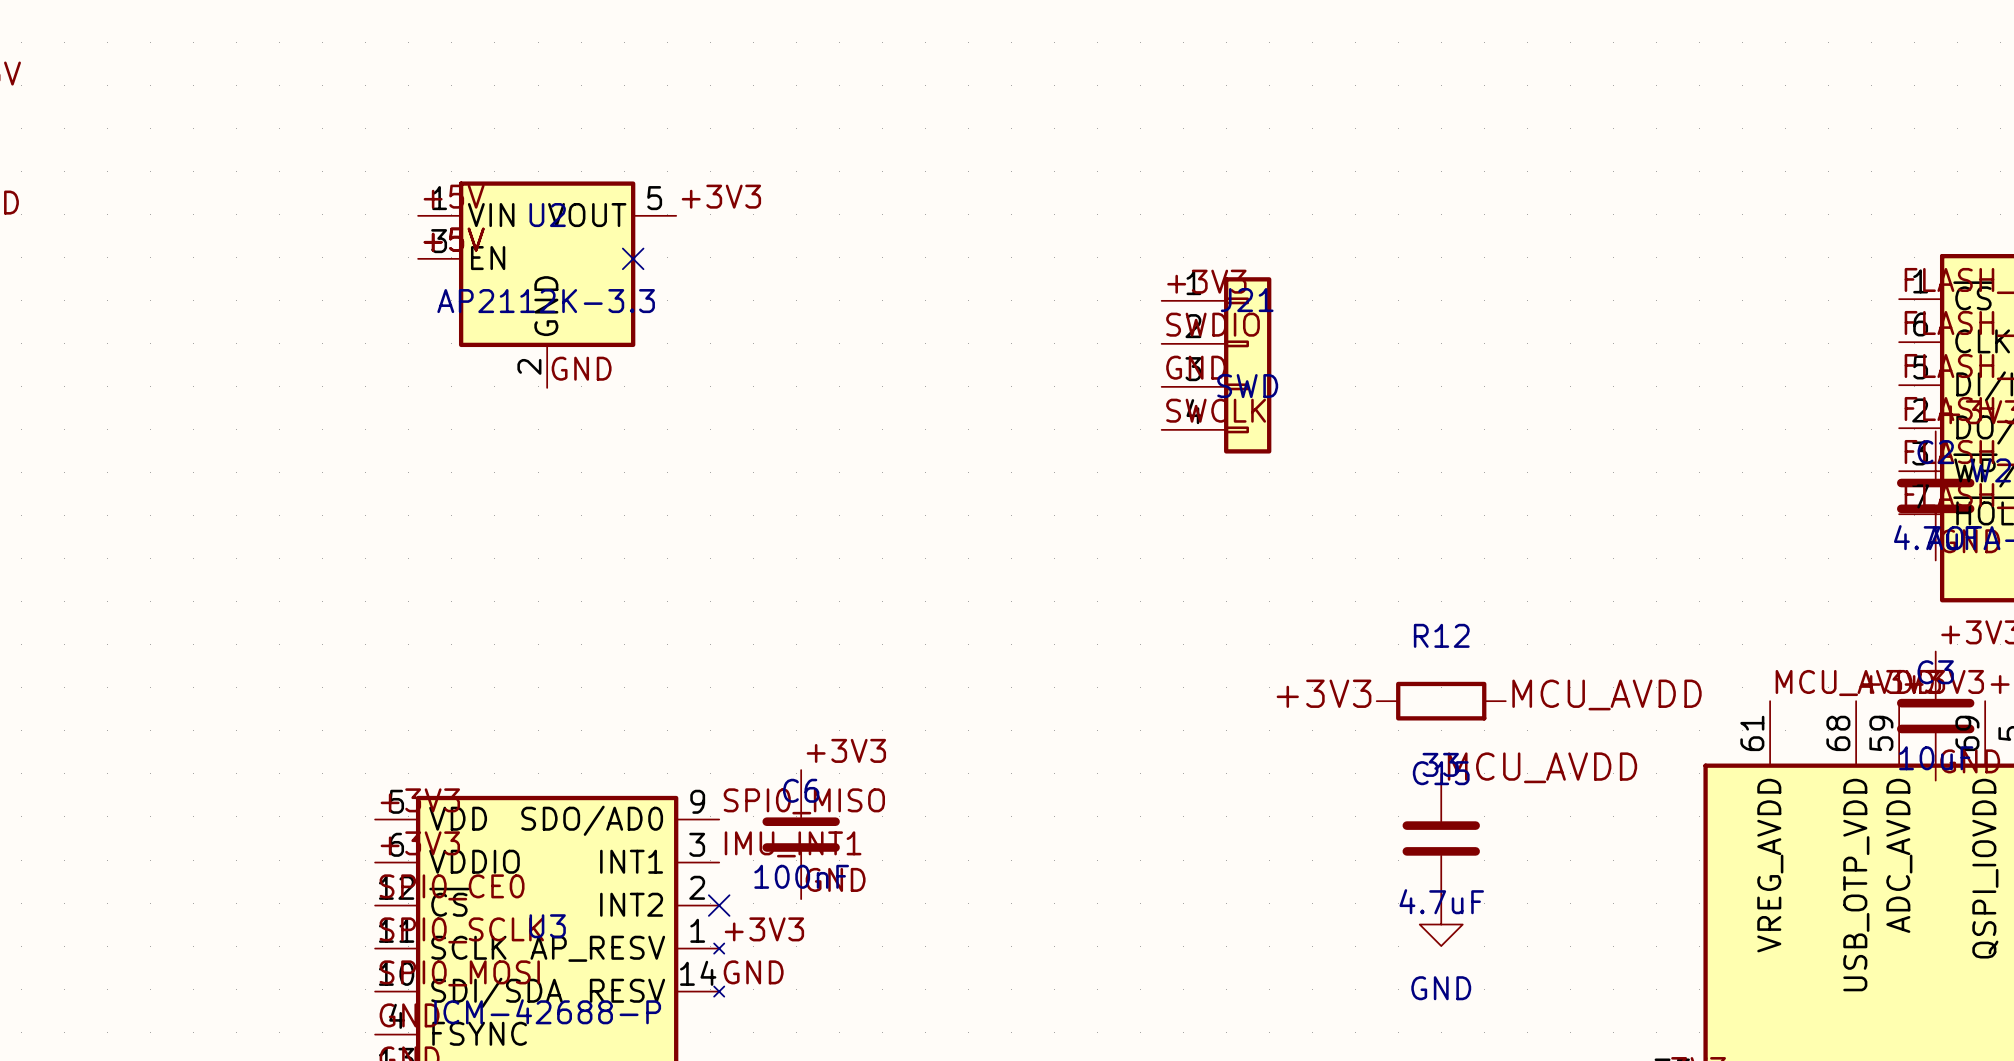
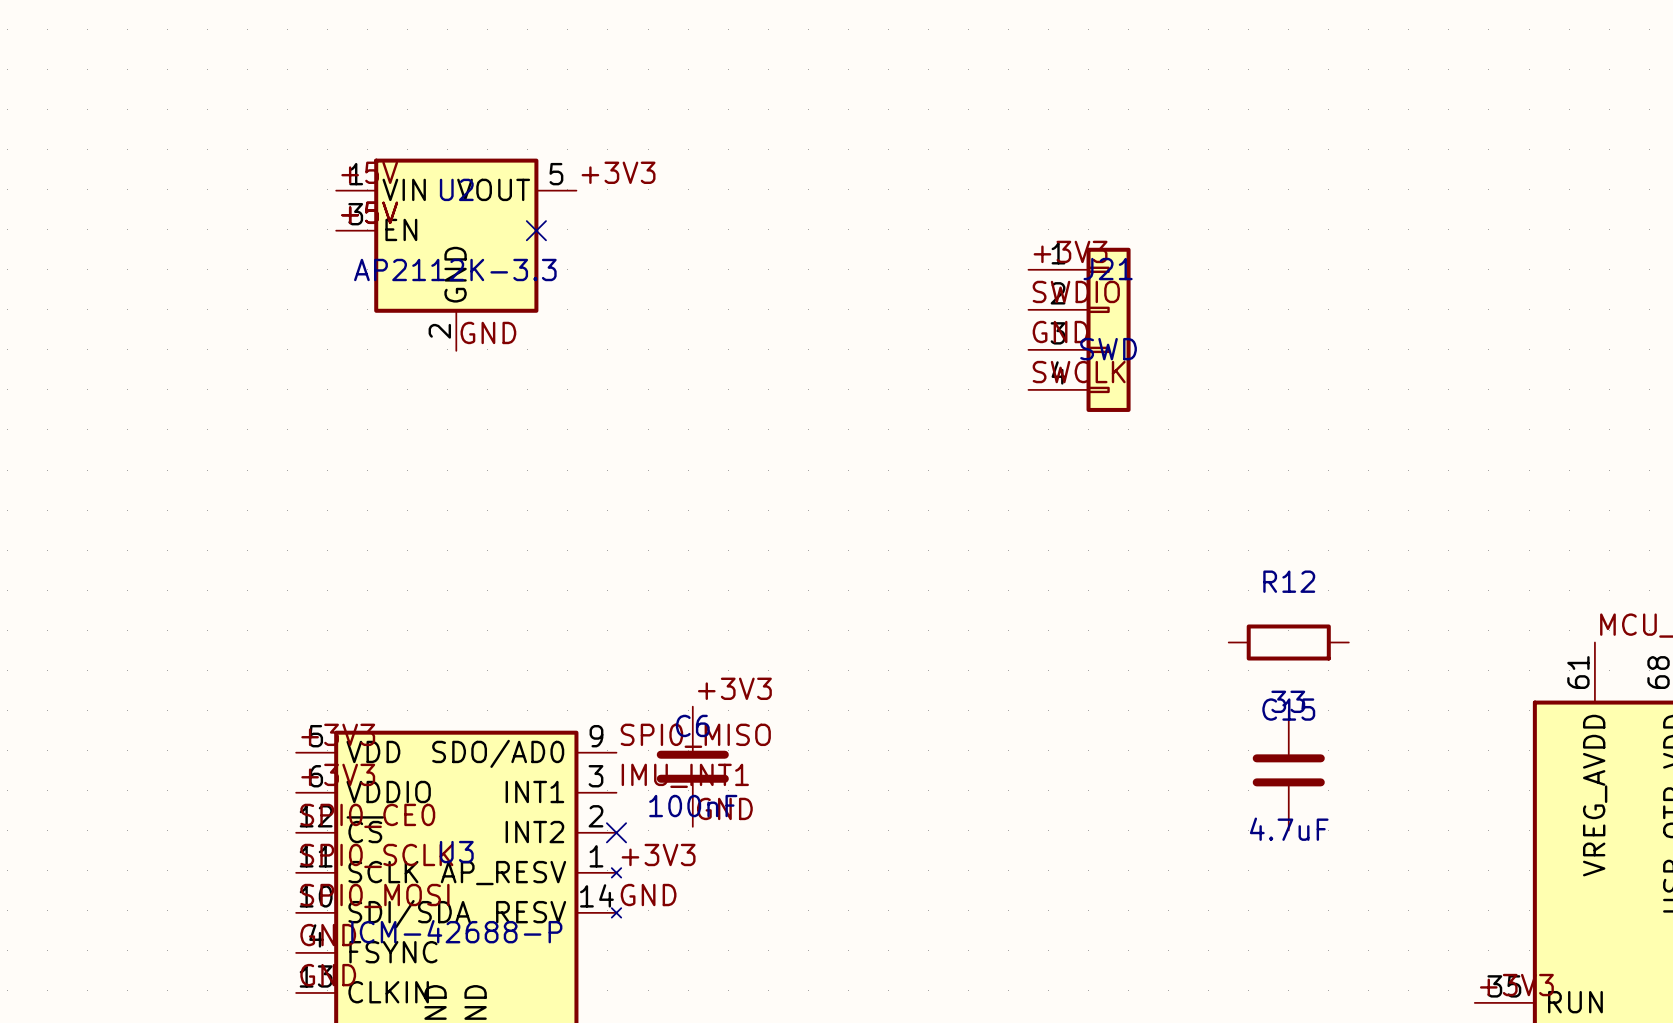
label: +3V3 (1324, 693) -> none
label: MCU_AVDD (1606, 694) -> none
label: MCU_AVDD (1542, 767) -> none
power symbol: GND (1441, 924) -> none

